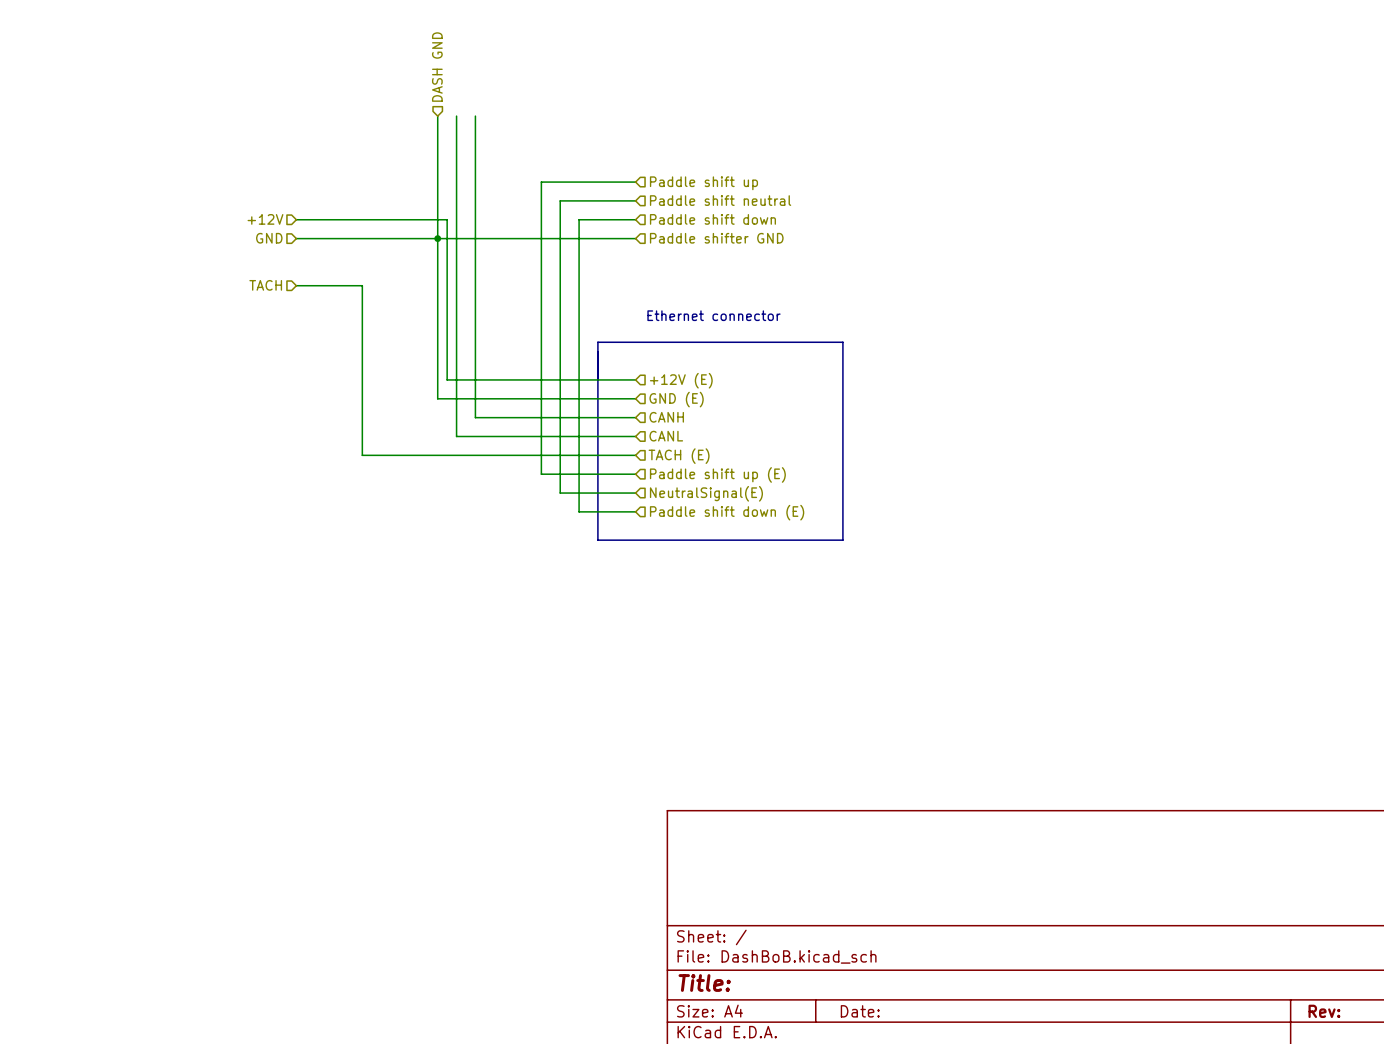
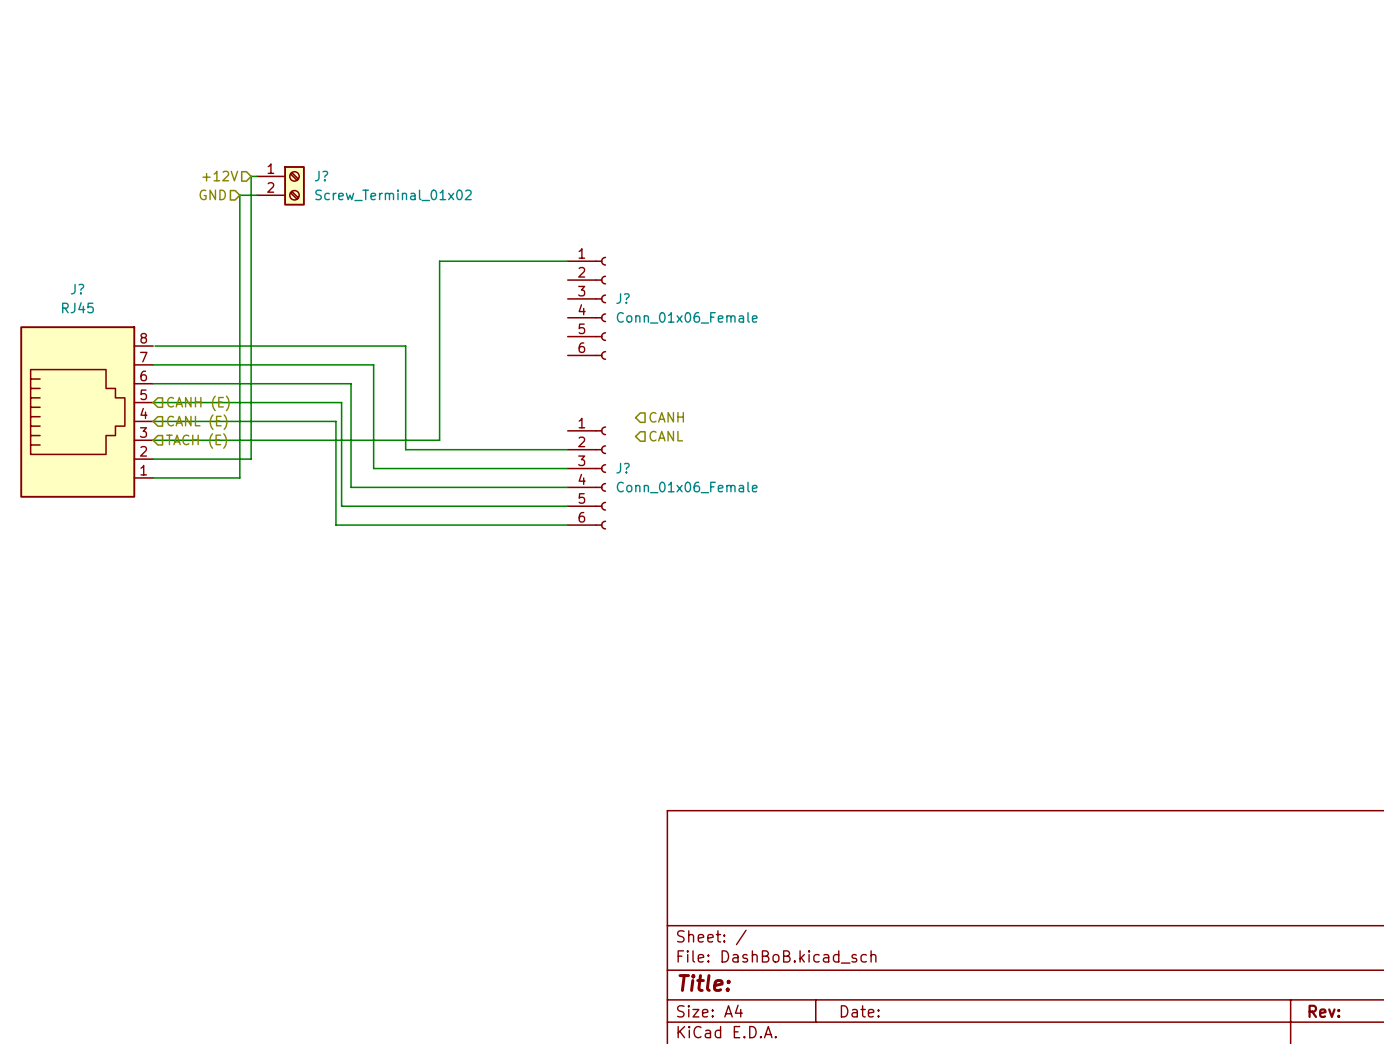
hierarchical label: DASH GND (437, 67) -> none
wire: (437, 116) (437, 398) (635, 398) -> none
wire: (456, 116) (456, 436) (635, 436) -> none
wire: (475, 116) (475, 417) (635, 417) -> none
wire: none -> (256, 176) (251, 176) (251, 459) (153, 459)
wire: (635, 182) (541, 182) (541, 474) (635, 474) -> none
hierarchical label: Paddle shift up (703, 183) -> none
J?: none -> Screw_Terminal_01x02 (280, 185)
wire: none -> (256, 195) (239, 195) (239, 477) (153, 477)
wire: (635, 200) (560, 200) (560, 493) (635, 493) -> none
hierarchical label: Paddle shift neutral (720, 200) -> none
hierarchical label position: +12V (265, 219) -> +12V (220, 176)
wire: (296, 219) (447, 219) (447, 379) (635, 379) -> none
wire: (635, 219) (579, 219) (579, 511) (635, 511) -> none
hierarchical label: Paddle shift down (712, 219) -> none
hierarchical label position: GND (269, 238) -> GND (212, 194)
wire: (296, 238) (635, 238) -> none
junction: (437, 238) -> none
hierarchical label: Paddle shifter GND (716, 238) -> none
wire: none -> (567, 261) (439, 261) (439, 440) (153, 440)
hierarchical label: TACH (265, 285) -> none
wire: (296, 285) (362, 285) (362, 455) (635, 455) -> none
J?: none -> Conn_01x06_Female (586, 308)
text: Ethernet connector (713, 315) -> none
line: (597, 342) (597, 540) (842, 540) (842, 342) (597, 342) -> none
wire: none -> (155, 346) (405, 346) (405, 449) (567, 449)
wire: none -> (153, 364) (373, 364) (373, 468) (567, 468)
hierarchical label: +12V (E) (681, 380) -> none
wire: none -> (153, 383) (351, 383) (351, 487) (567, 487)
hierarchical label: GND (E) (676, 399) -> none
wire: none -> (153, 402) (341, 402) (341, 506) (567, 506)
hierarchical label: none -> CANH (E) (198, 403)
J?: none -> RJ45 (86, 411)
wire: none -> (153, 421) (335, 421) (335, 525) (567, 525)
hierarchical label: none -> CANL (E) (197, 422)
hierarchical label: none -> TACH (E) (196, 441)
hierarchical label: TACH (E) (679, 456) -> none
hierarchical label: Paddle shift up (E) (717, 474) -> none
J?: none -> Conn_01x06_Female (586, 477)
hierarchical label: NeutralSignal(E) (706, 493) -> none
hierarchical label: Paddle shift down (E) (727, 512) -> none

